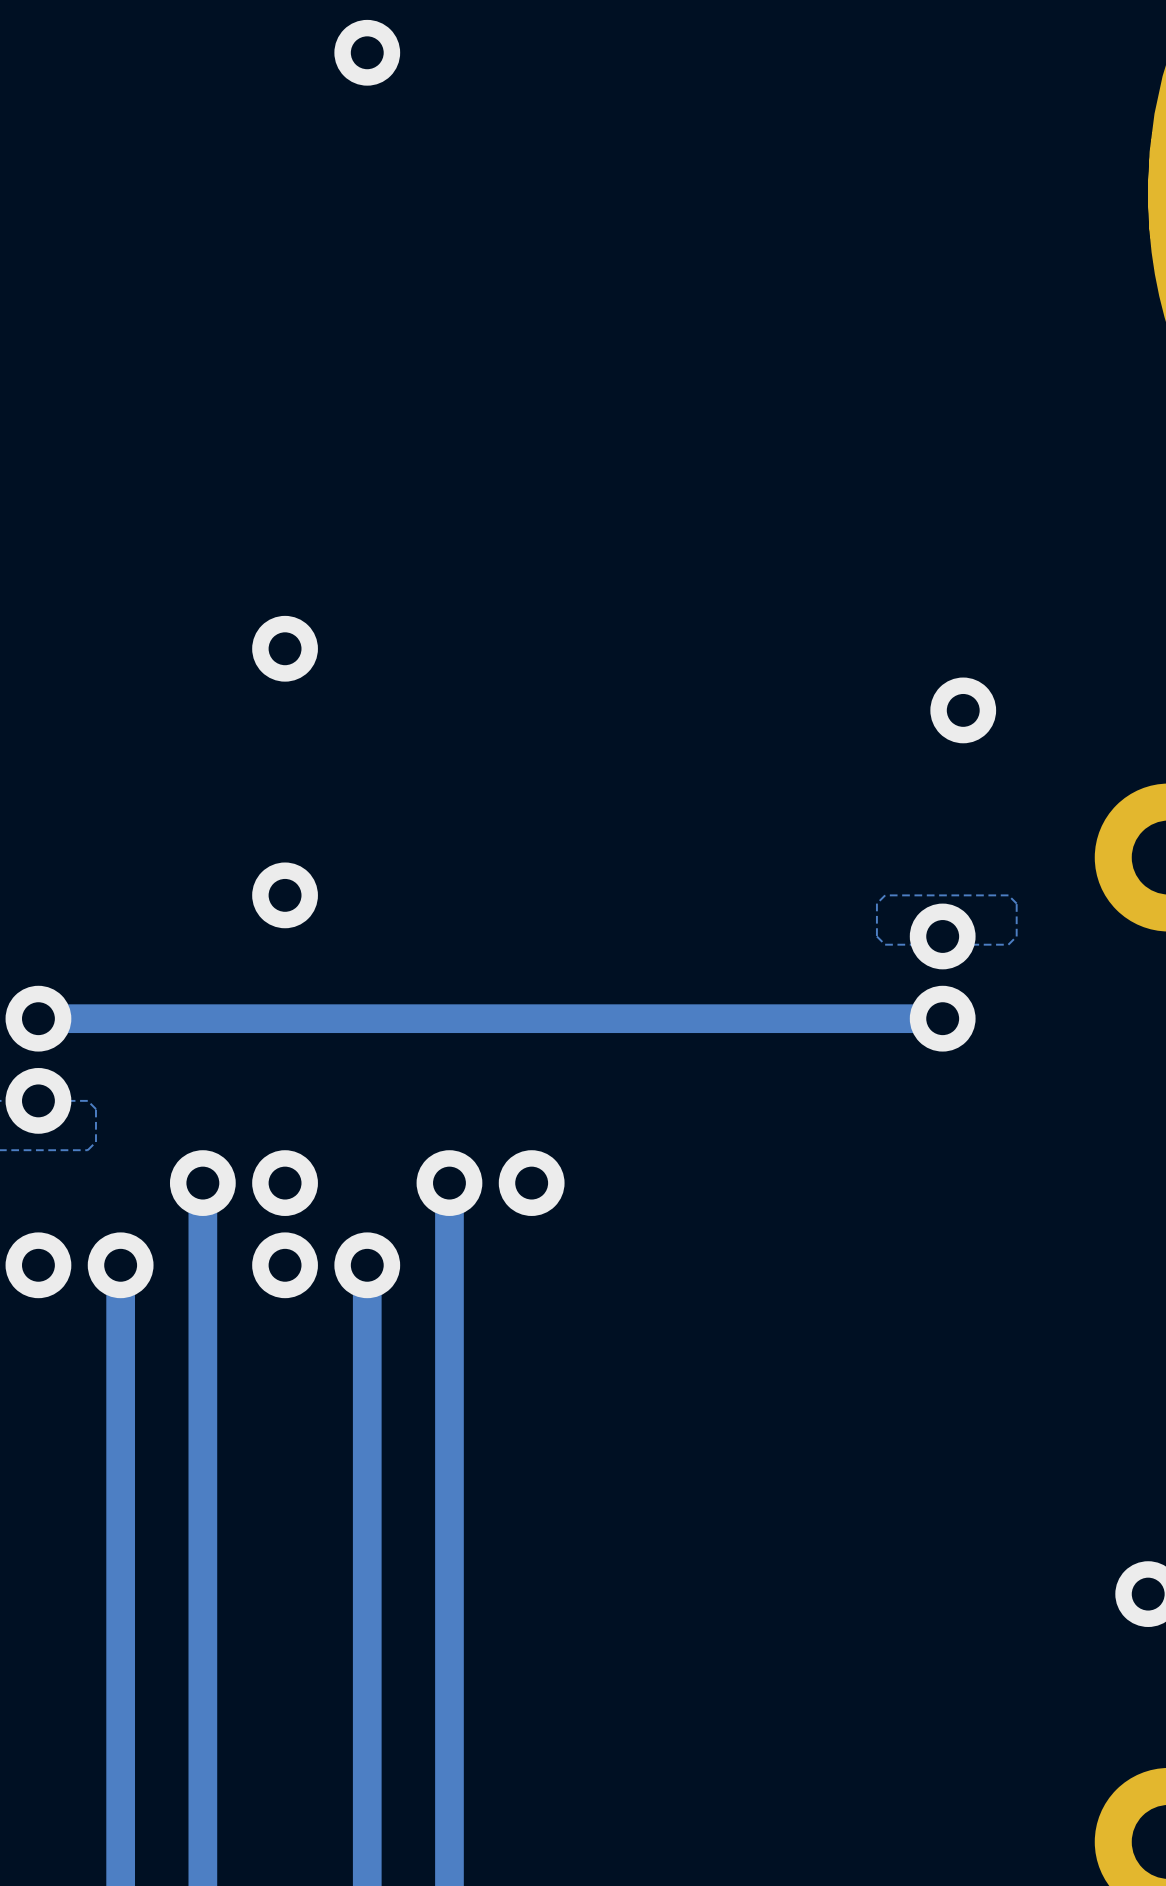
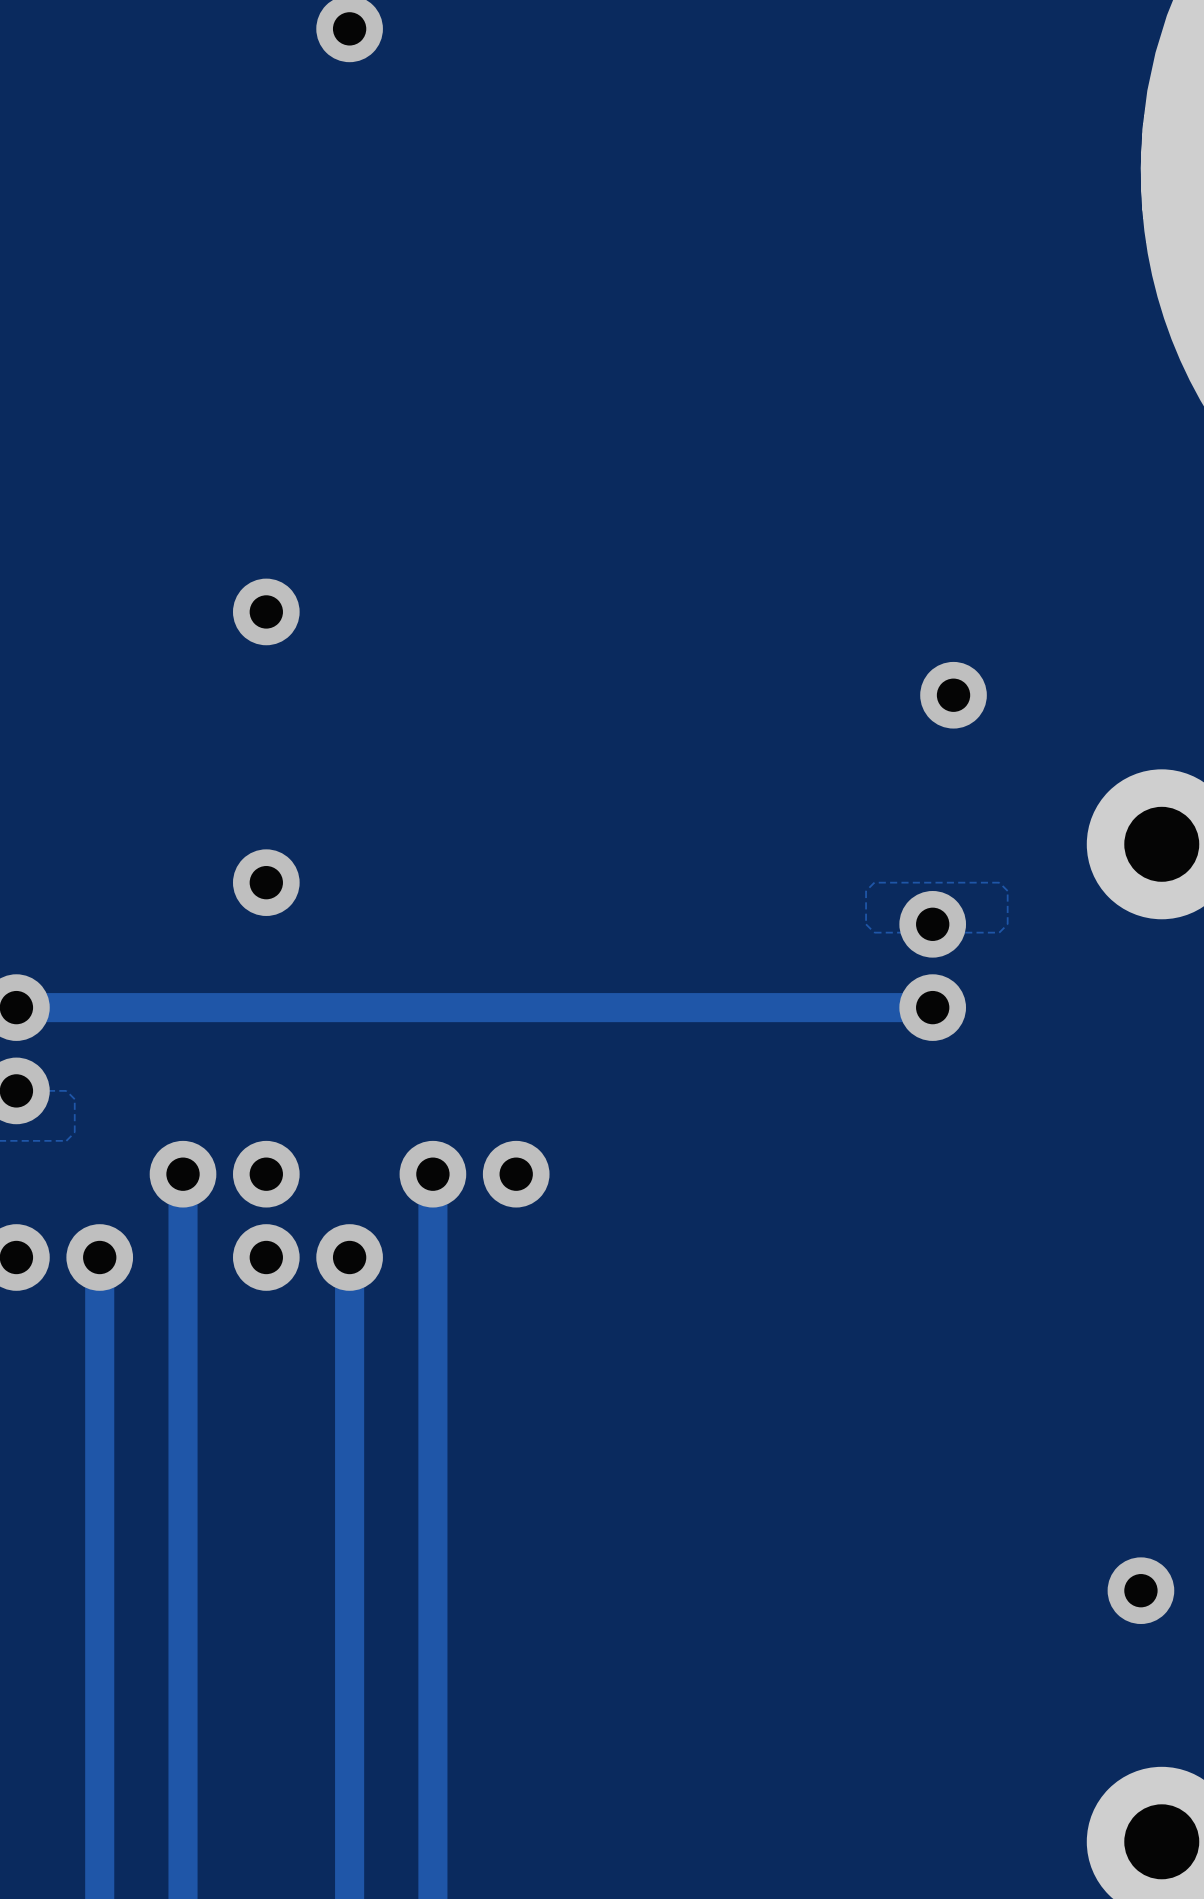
via position: (285, 648) -> (266, 611)

